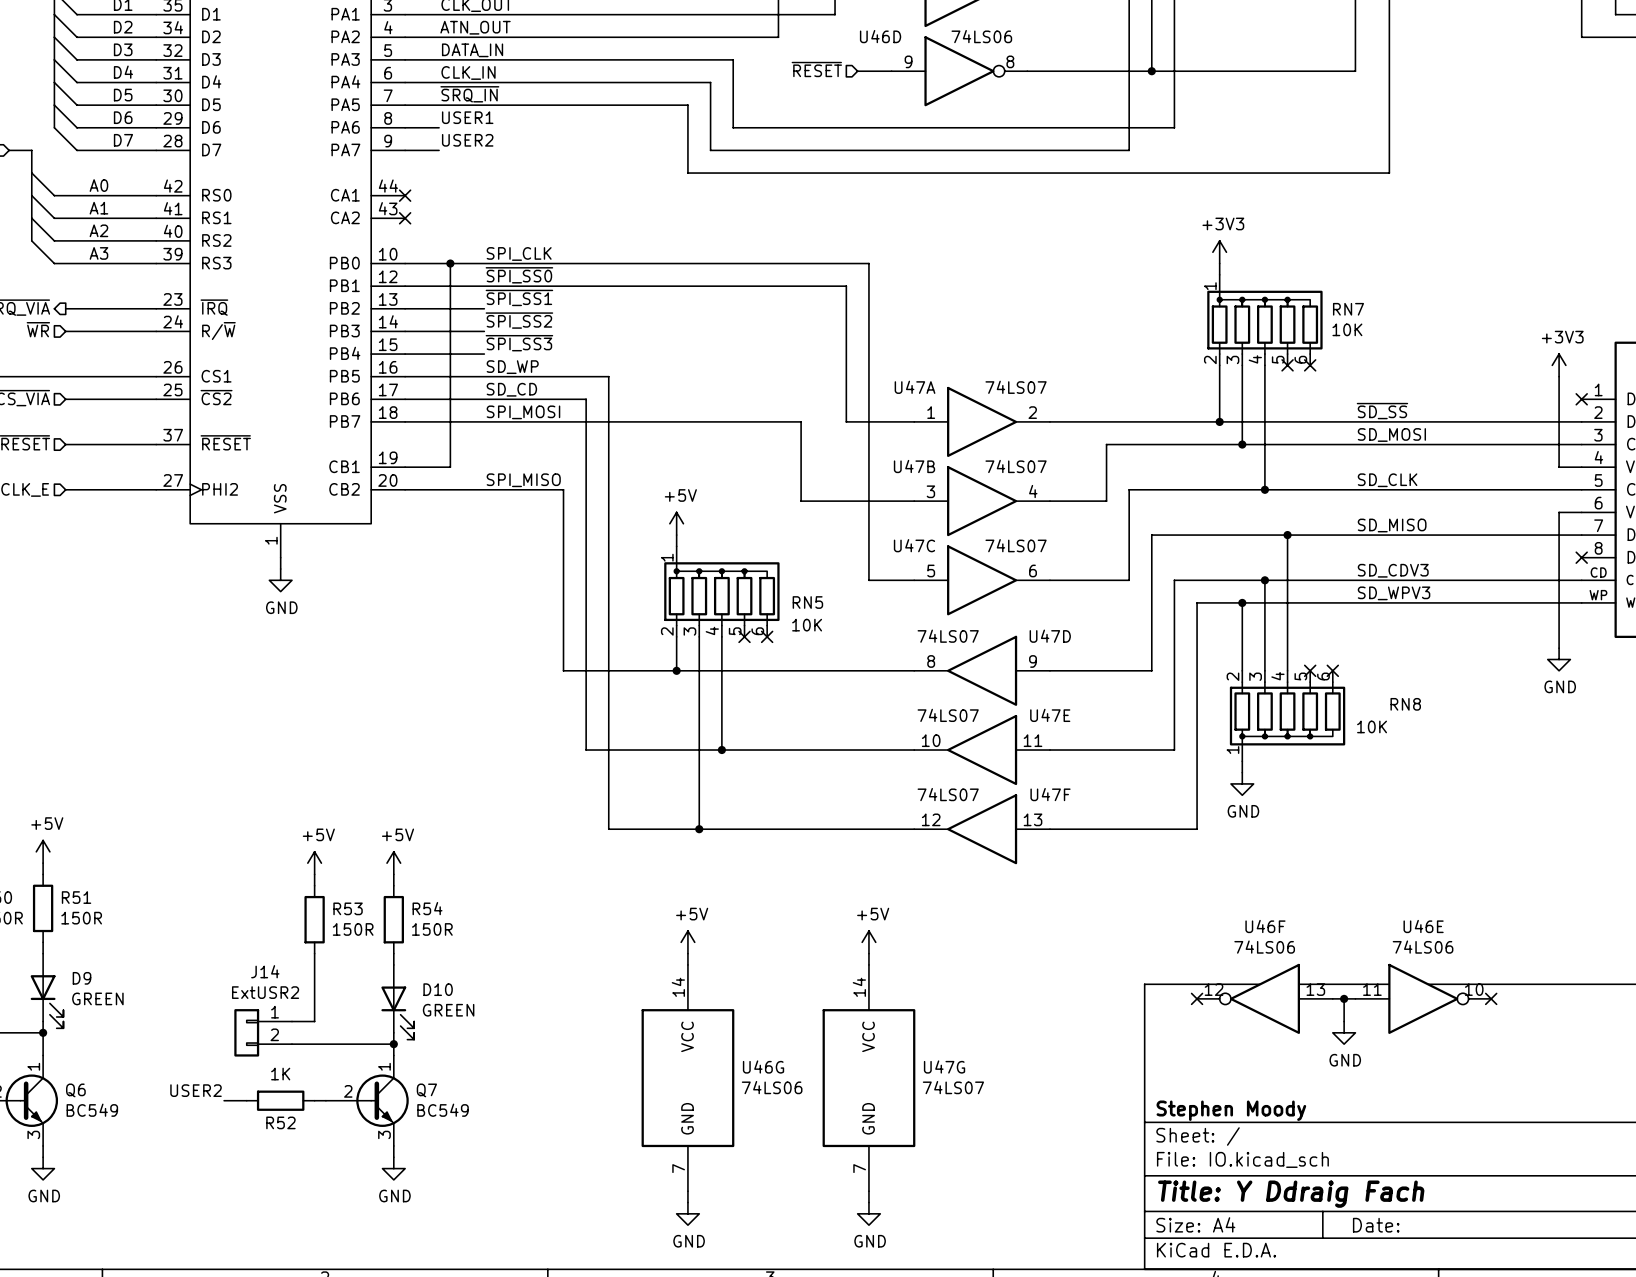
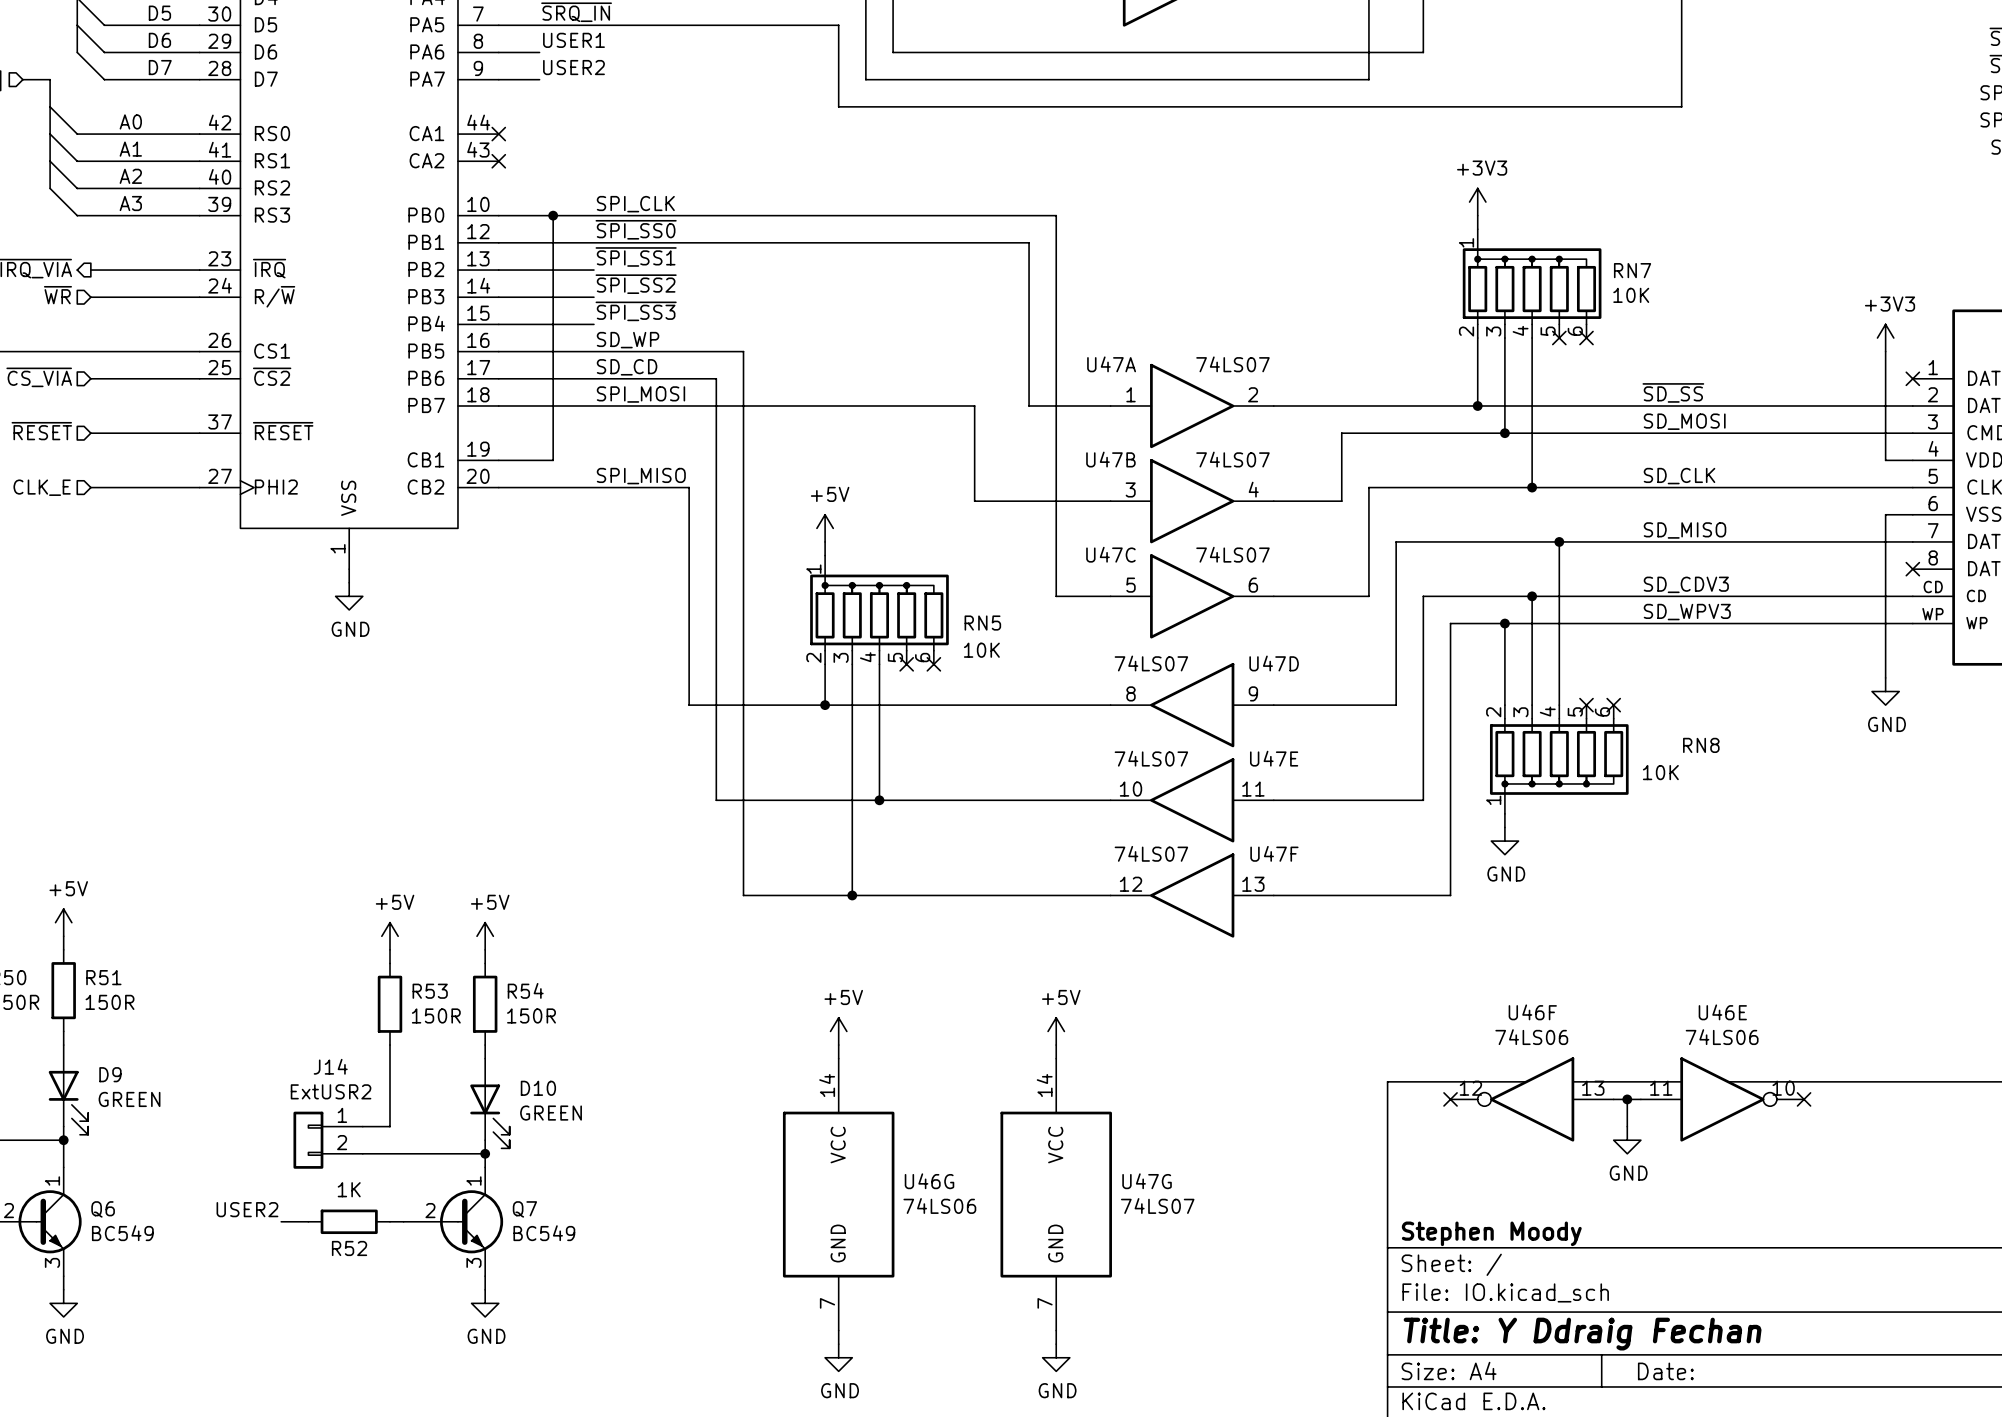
title block: Title: Y Ddraig Fach (1291, 1194) -> Title: Y Ddraig Fechan (1582, 1334)

